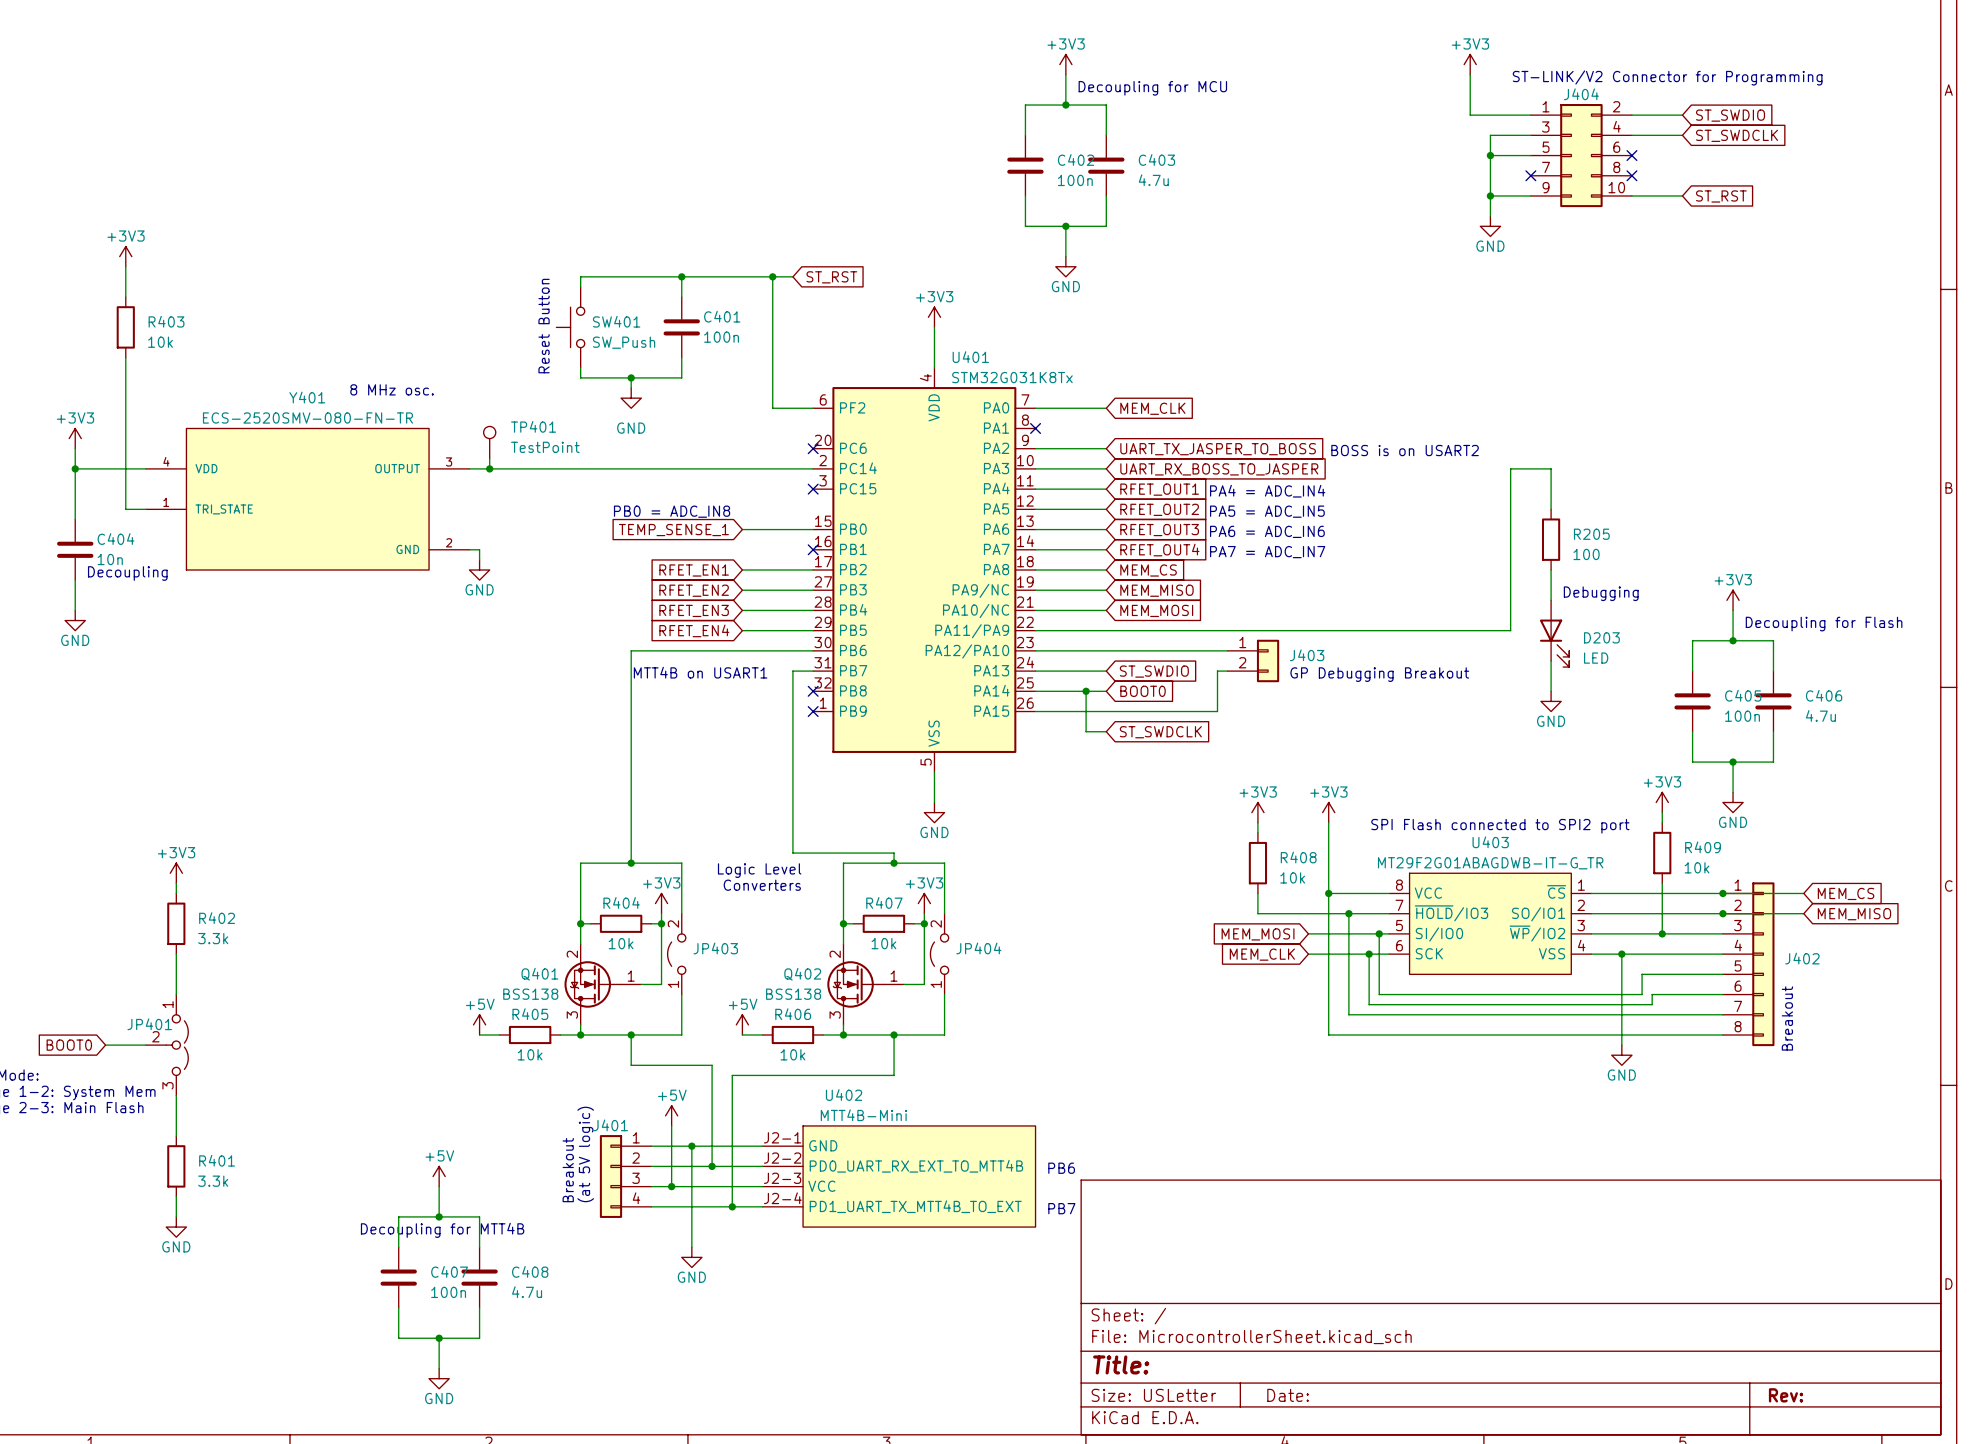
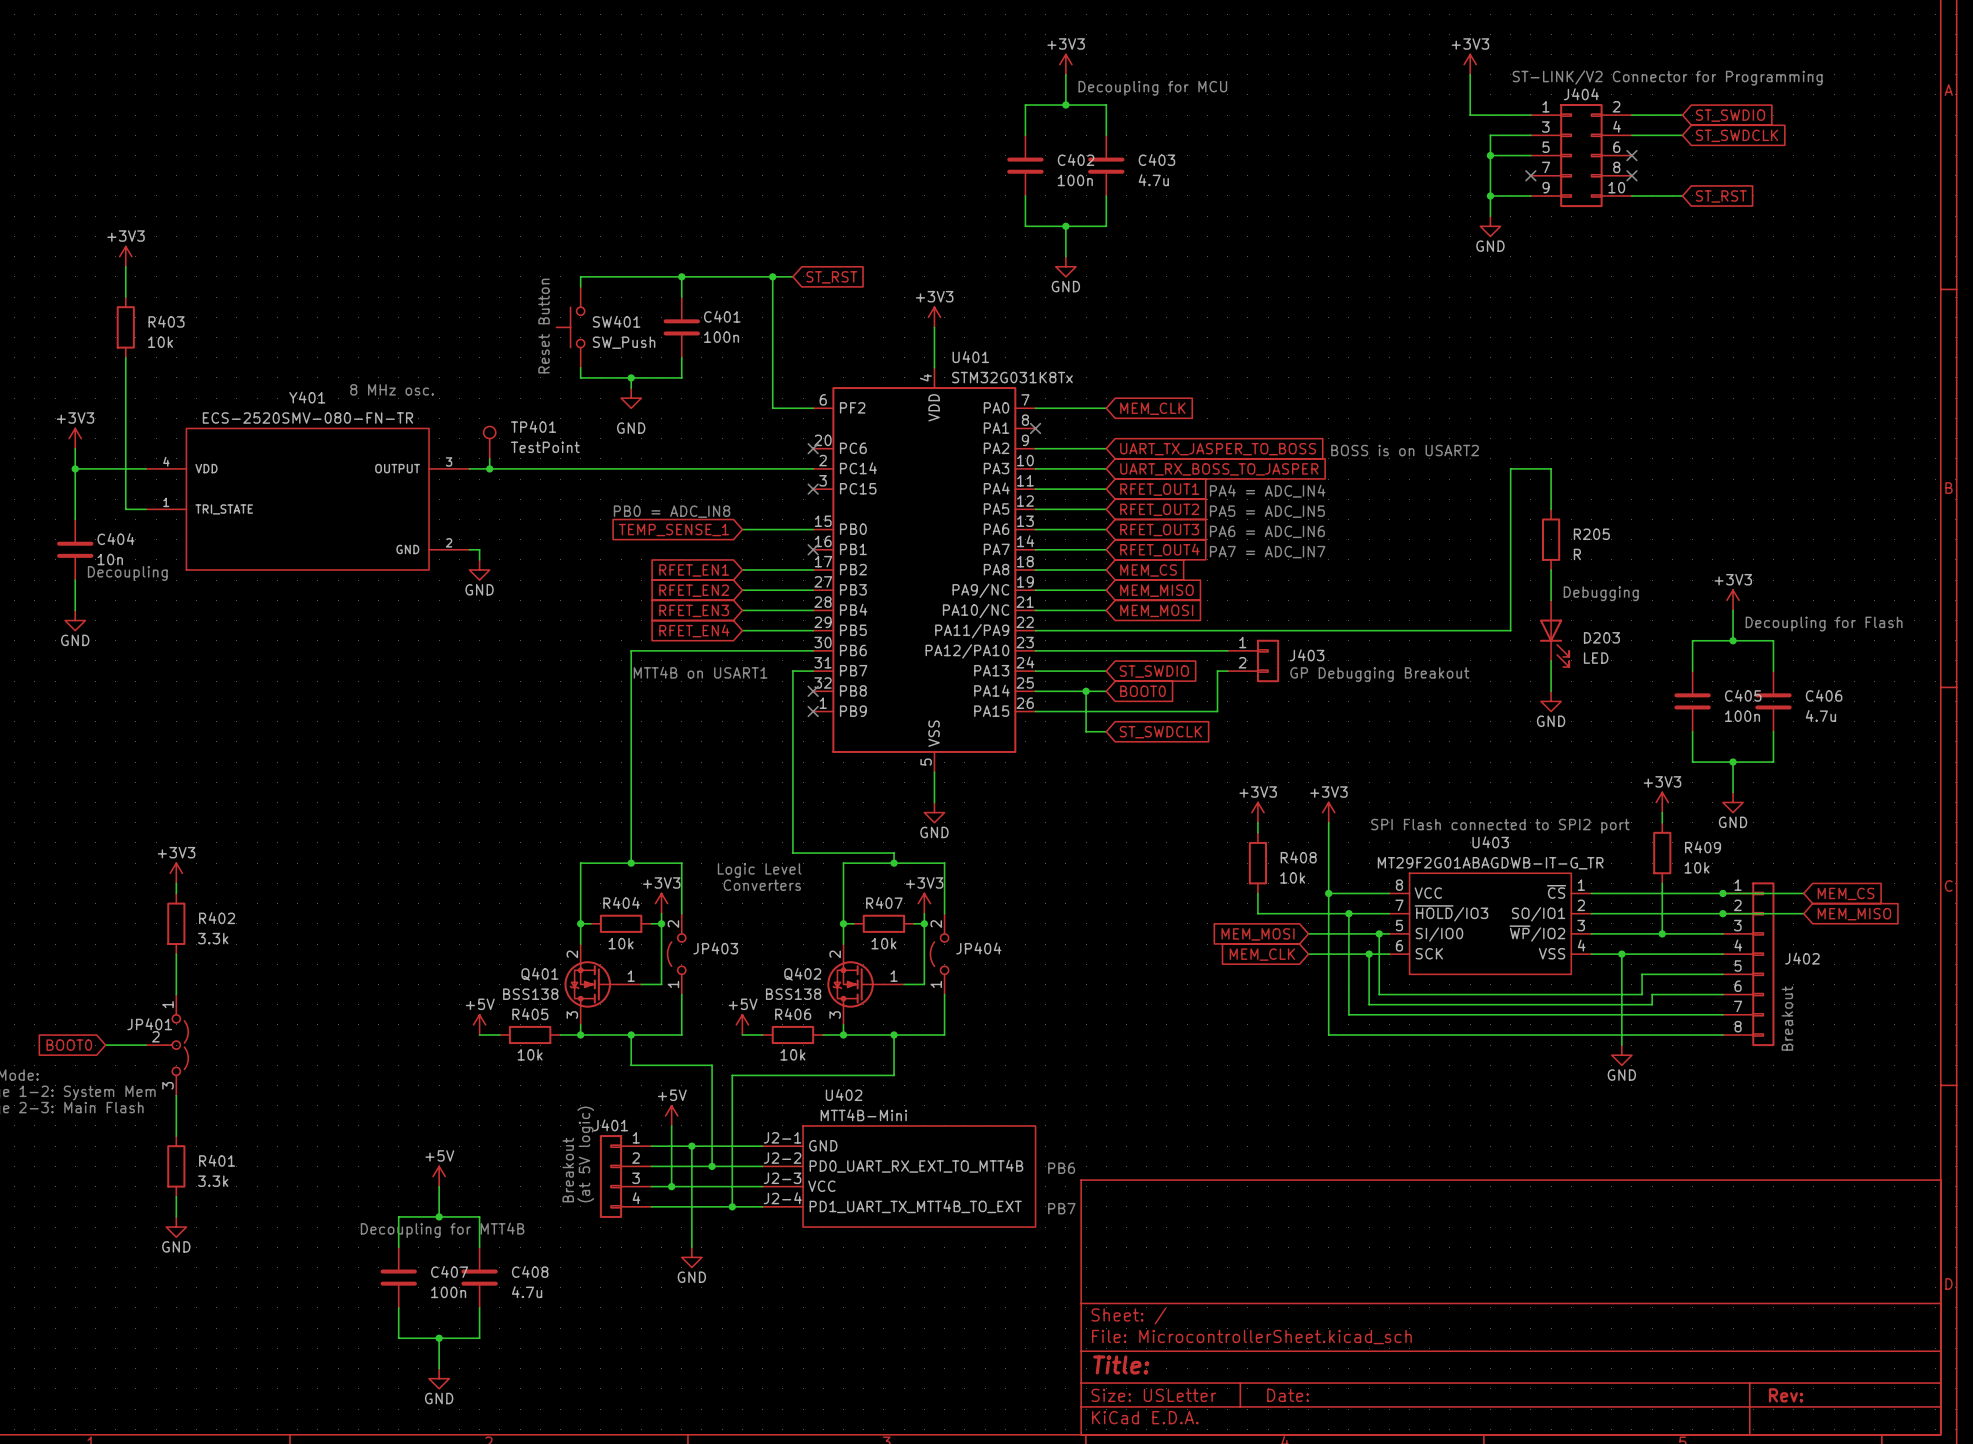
R205 value: 100 (1586, 554) -> R (1577, 554)

